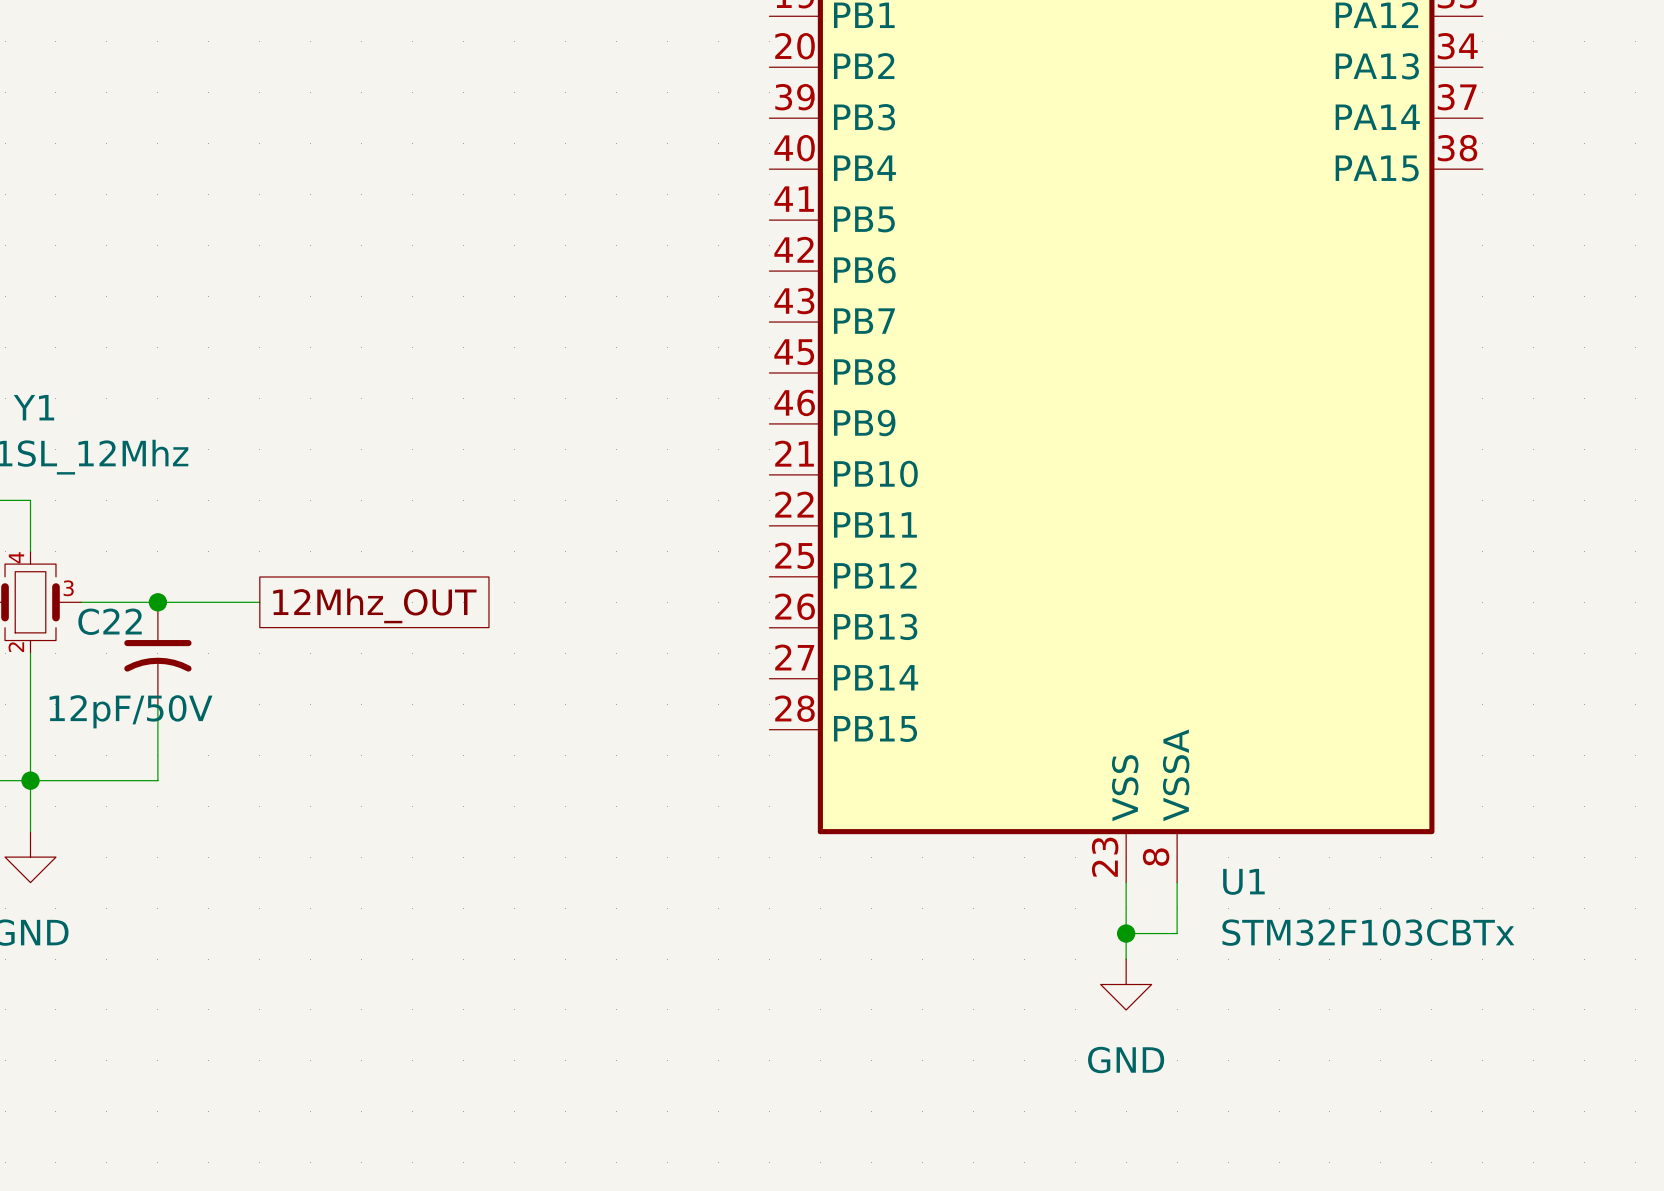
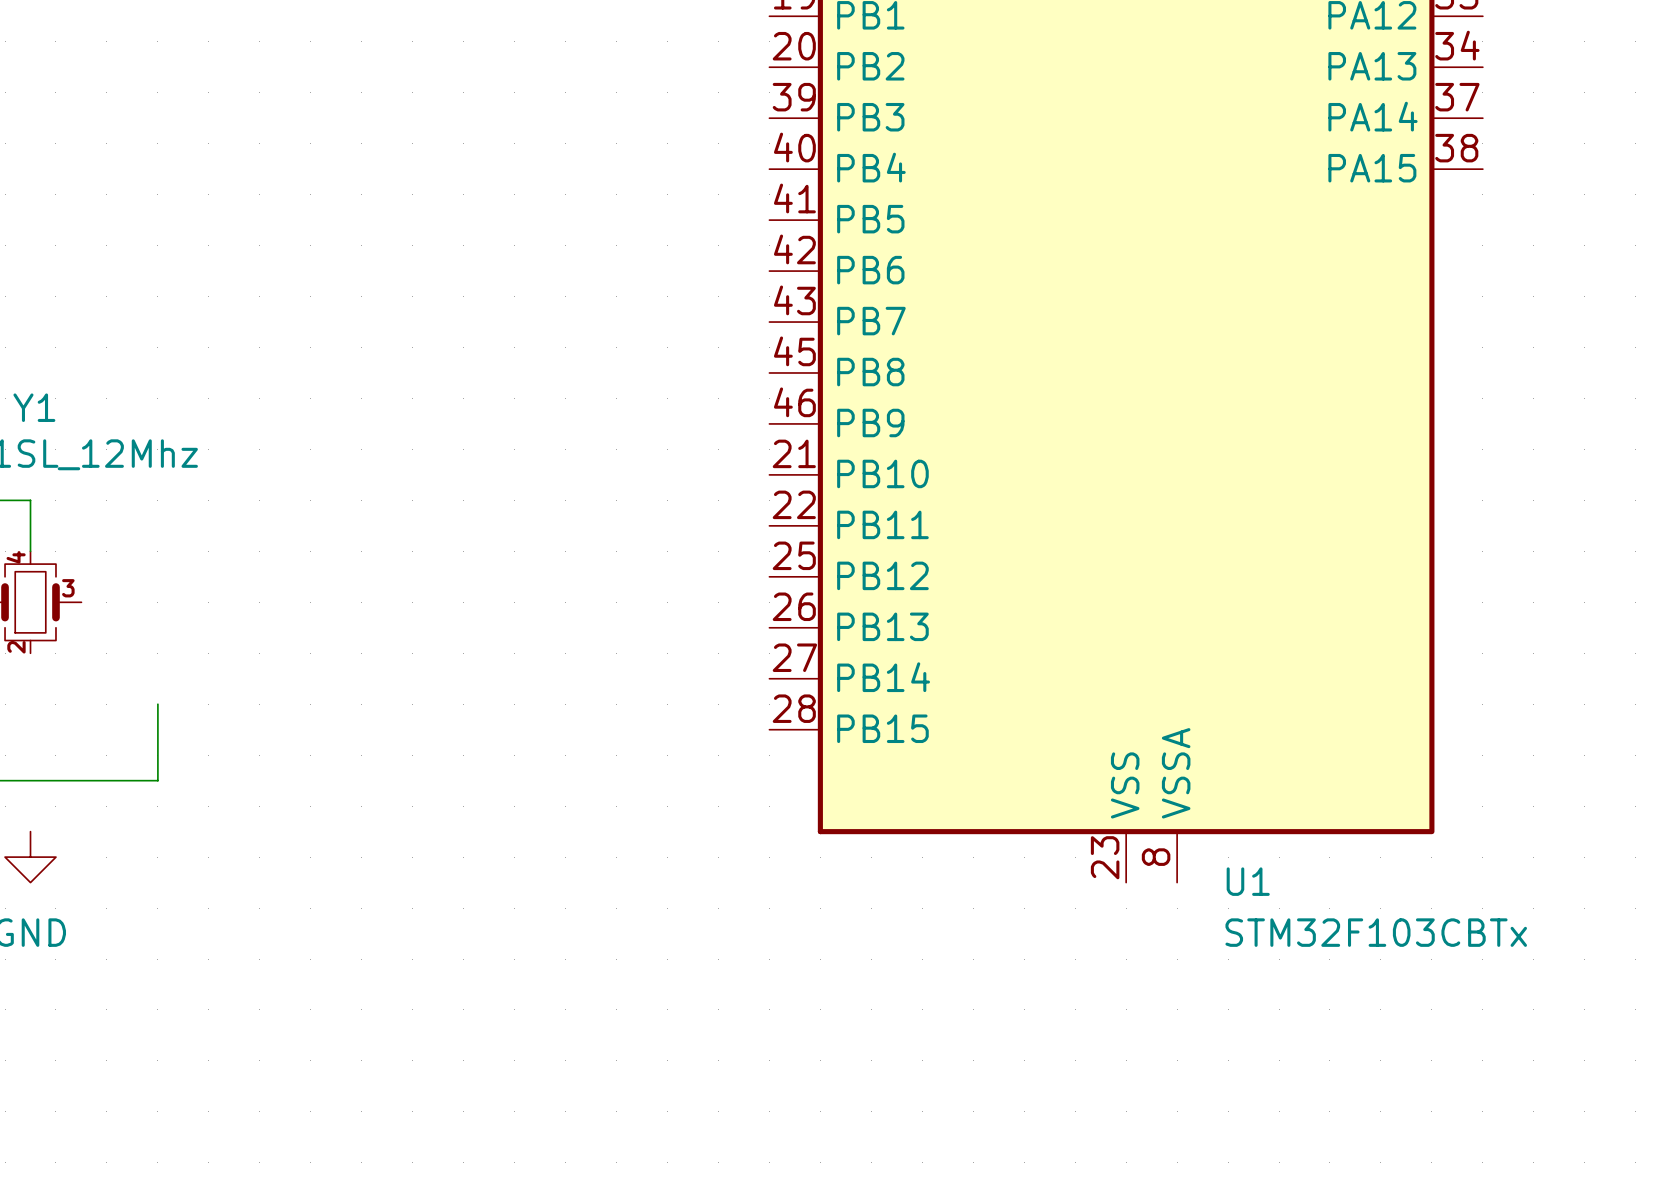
wire: (81, 602) (259, 602) -> none
junction: (157, 602) -> none
global label: 12Mhz_OUT (374, 605) -> none
wire: (30, 653) (30, 831) -> none
C22: 12pF/50V (157, 653) -> none
junction: (30, 780) -> none
wire: (1126, 882) (1126, 959) -> none
wire: (1177, 882) (1177, 933) (1126, 933) -> none
junction: (1126, 933) -> none
power symbol: GND (1126, 984) -> none

